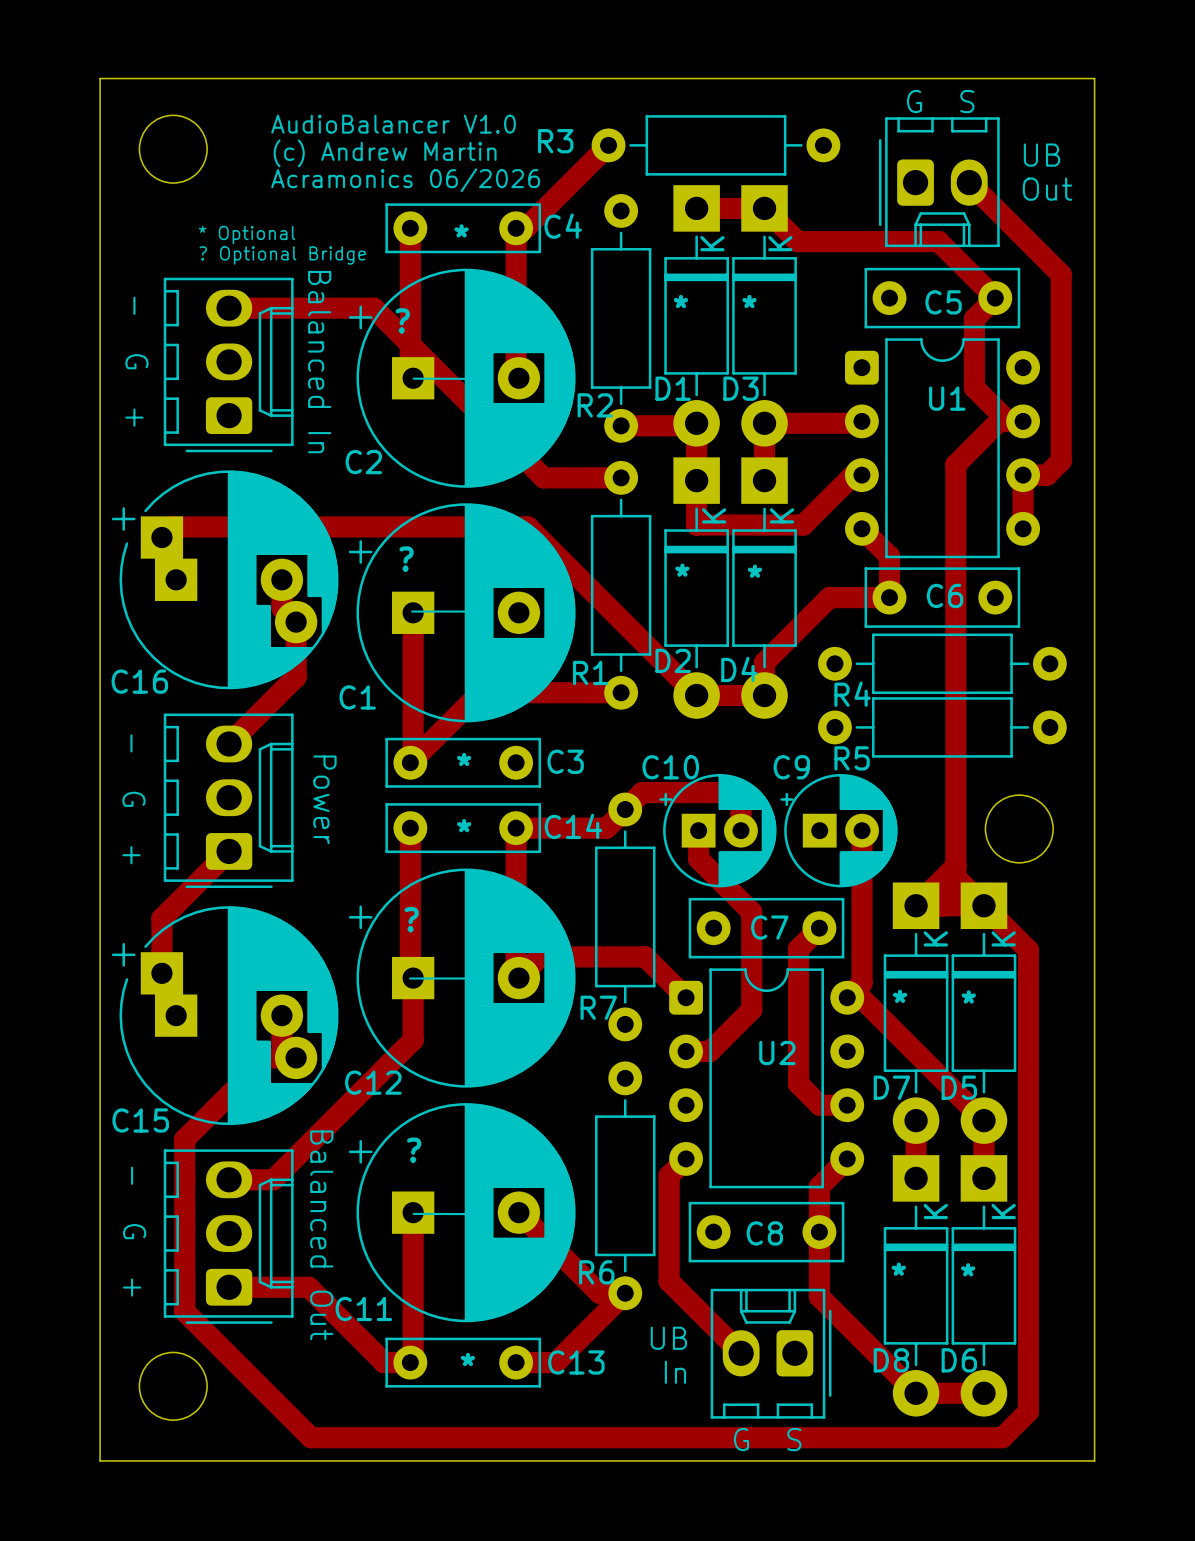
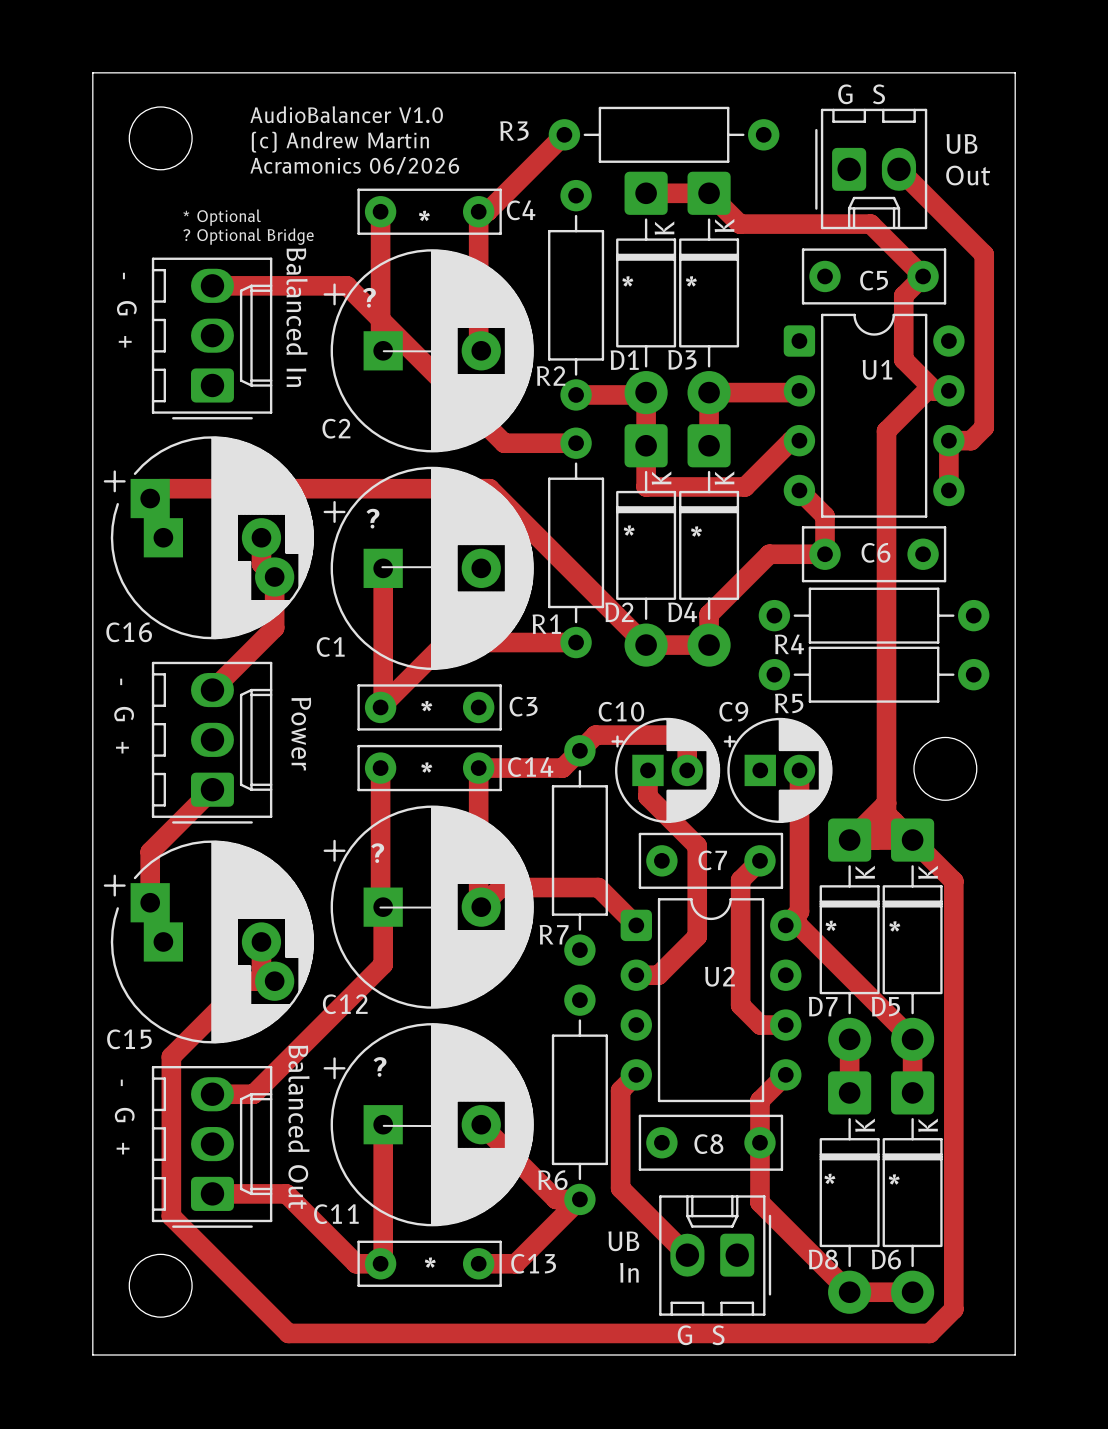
D1 footprint: [664, 185, 729, 447] -> [616, 171, 677, 415]
D3 footprint: [732, 185, 797, 447] -> [679, 171, 740, 415]
D2 footprint: [664, 457, 729, 719] -> [616, 424, 677, 667]
D4 footprint: [732, 457, 797, 719] -> [679, 424, 740, 667]
D7 footprint: [883, 882, 949, 1144] -> [819, 818, 880, 1061]
D5 footprint: [951, 882, 1017, 1144] -> [882, 818, 943, 1061]
D8 footprint: [883, 1155, 949, 1417] -> [819, 1071, 880, 1314]
D6 footprint: [951, 1155, 1017, 1417] -> [882, 1071, 943, 1314]

